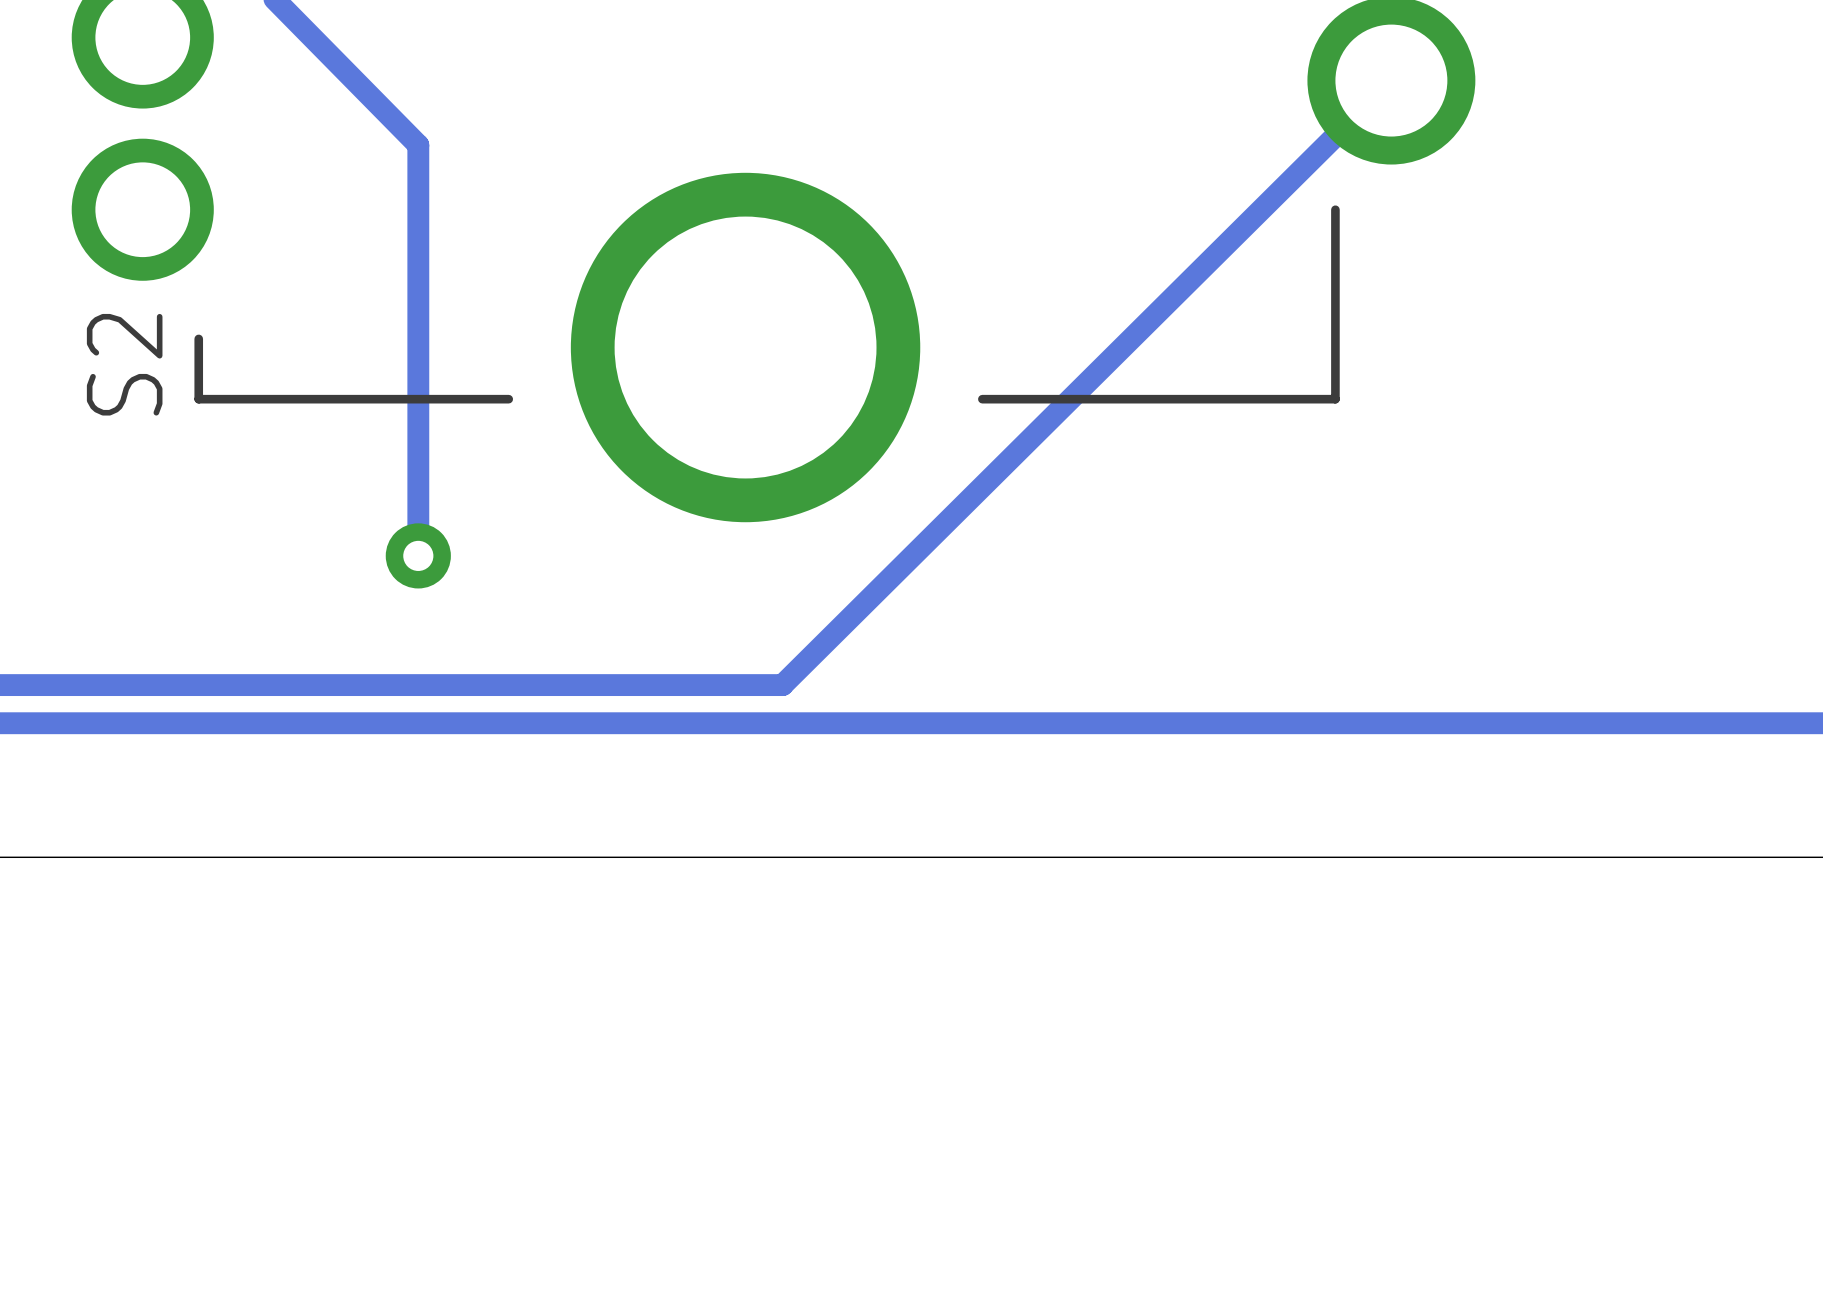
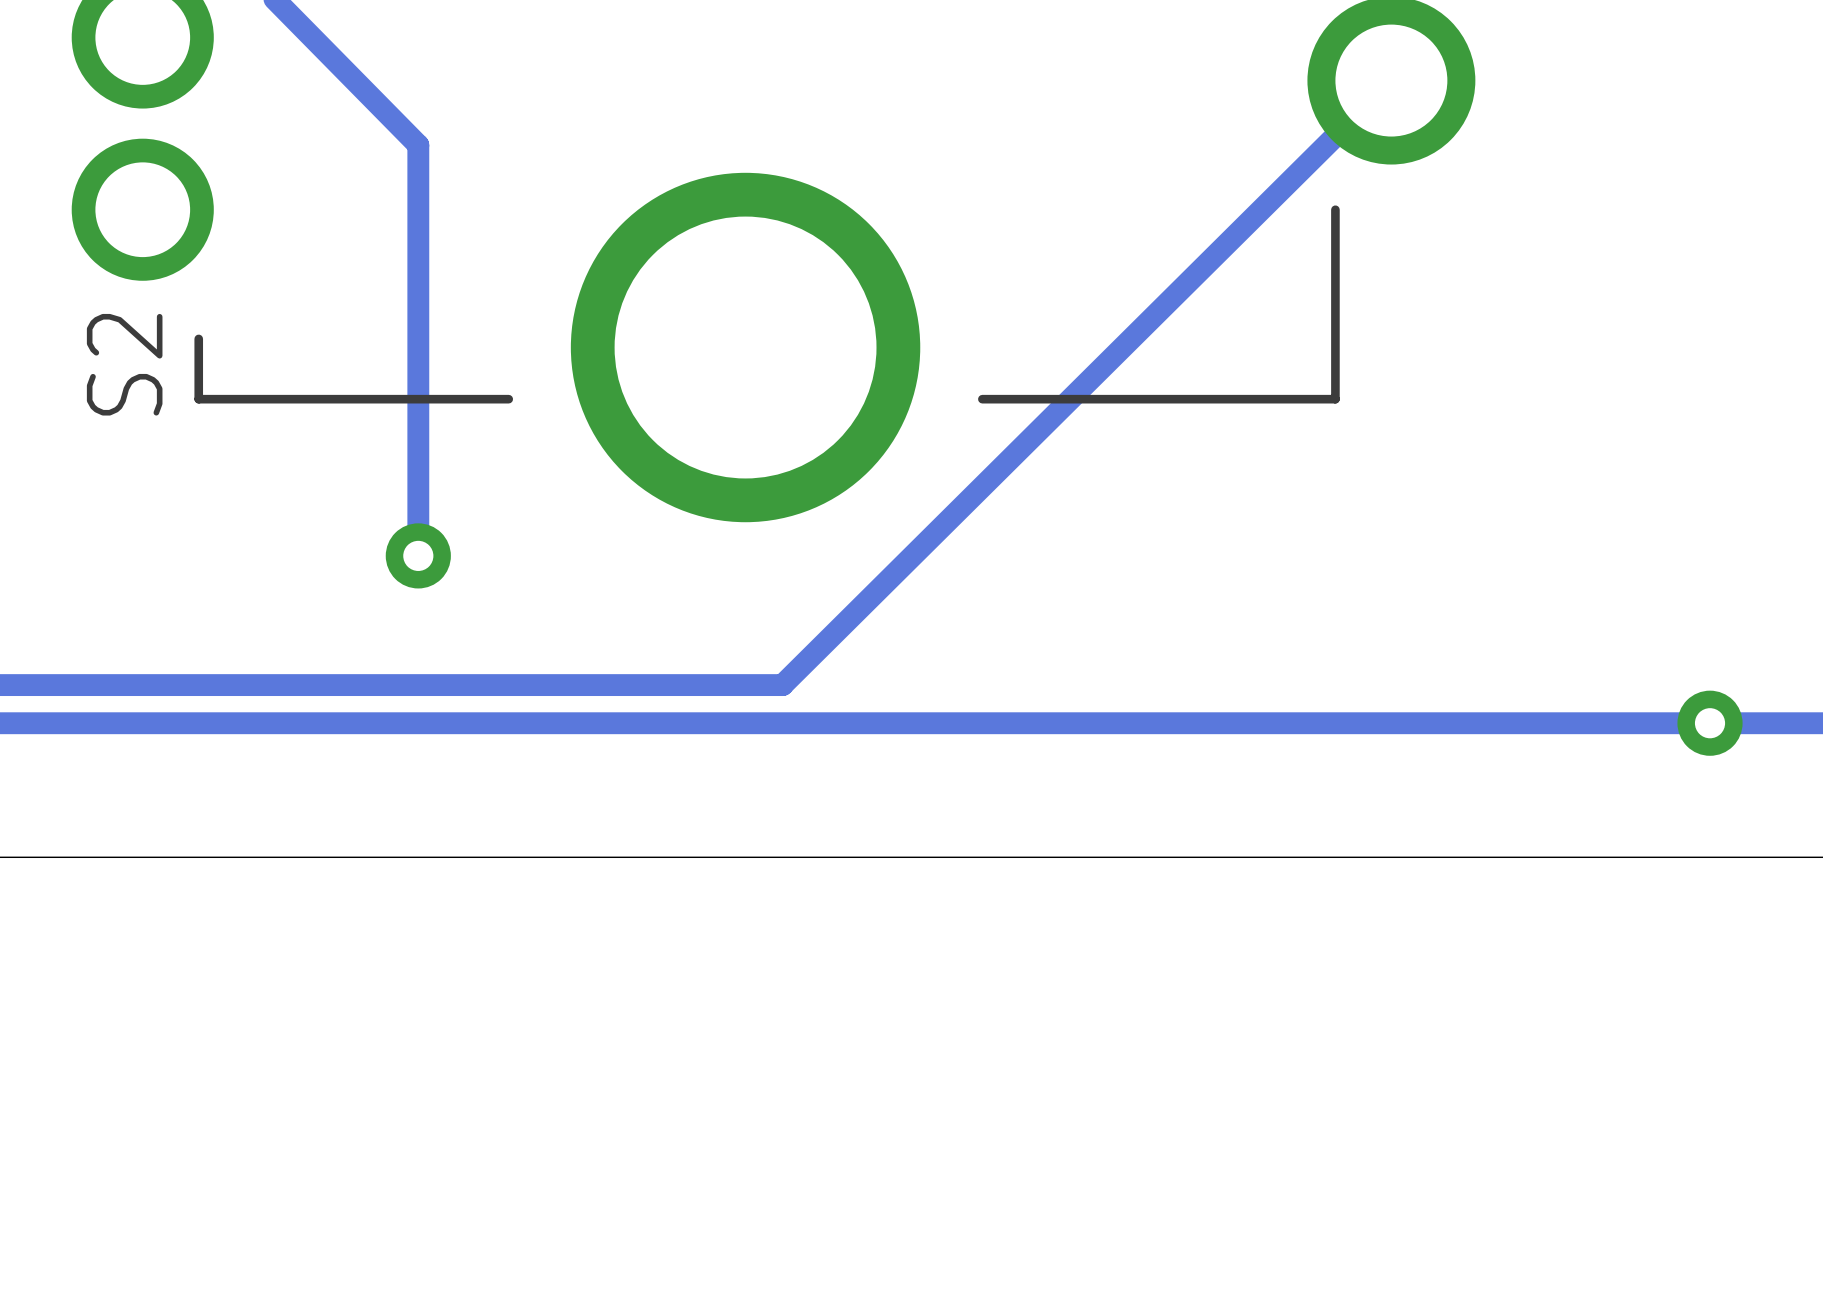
via: none -> (1710, 723)

